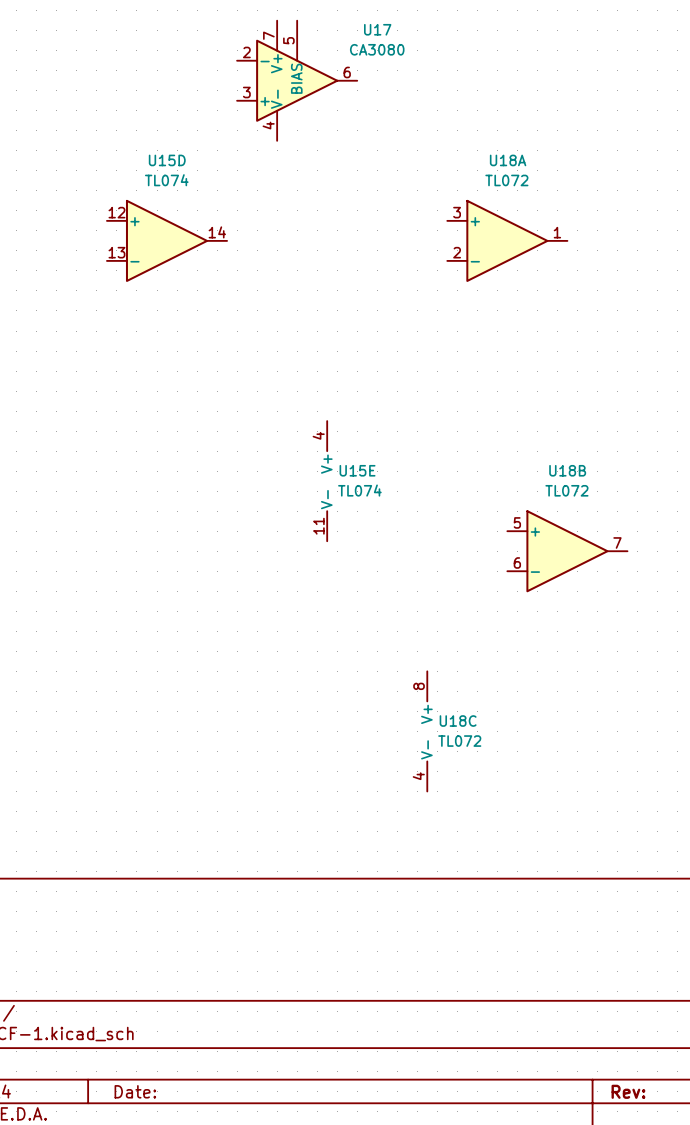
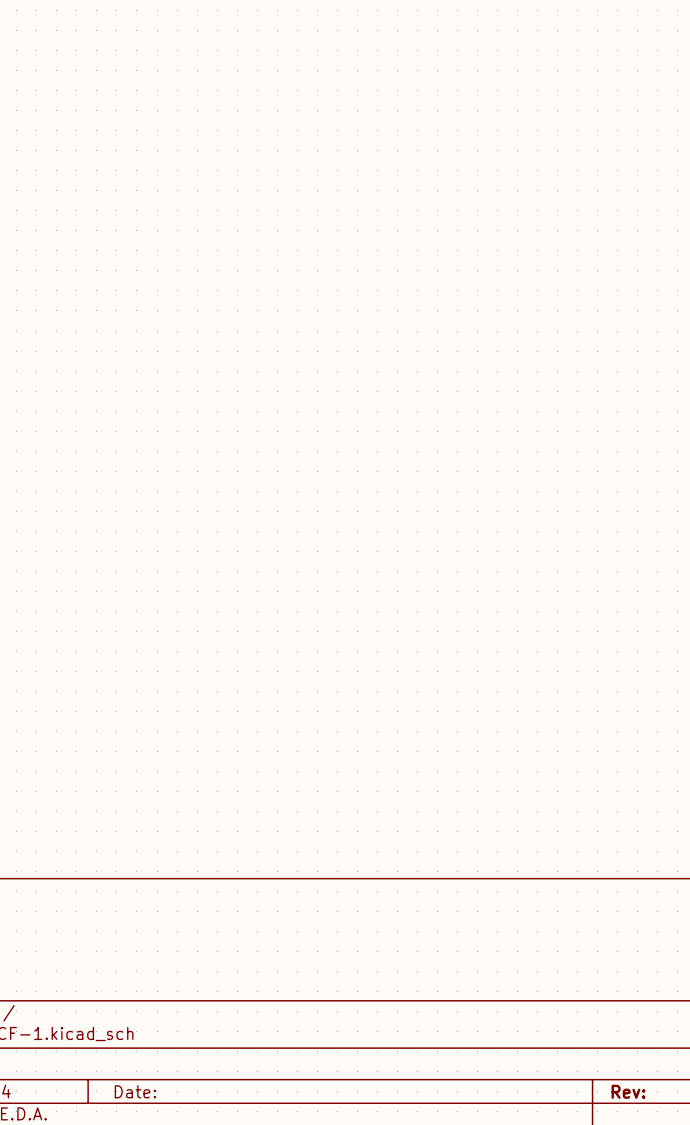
U17: CA3080 (297, 80) -> none
U15D: TL074 (167, 240) -> none
U18A: TL072 (507, 240) -> none
U15E: TL074 (327, 481) -> none
U18B: TL072 (567, 551) -> none
U18C: TL072 (427, 731) -> none

